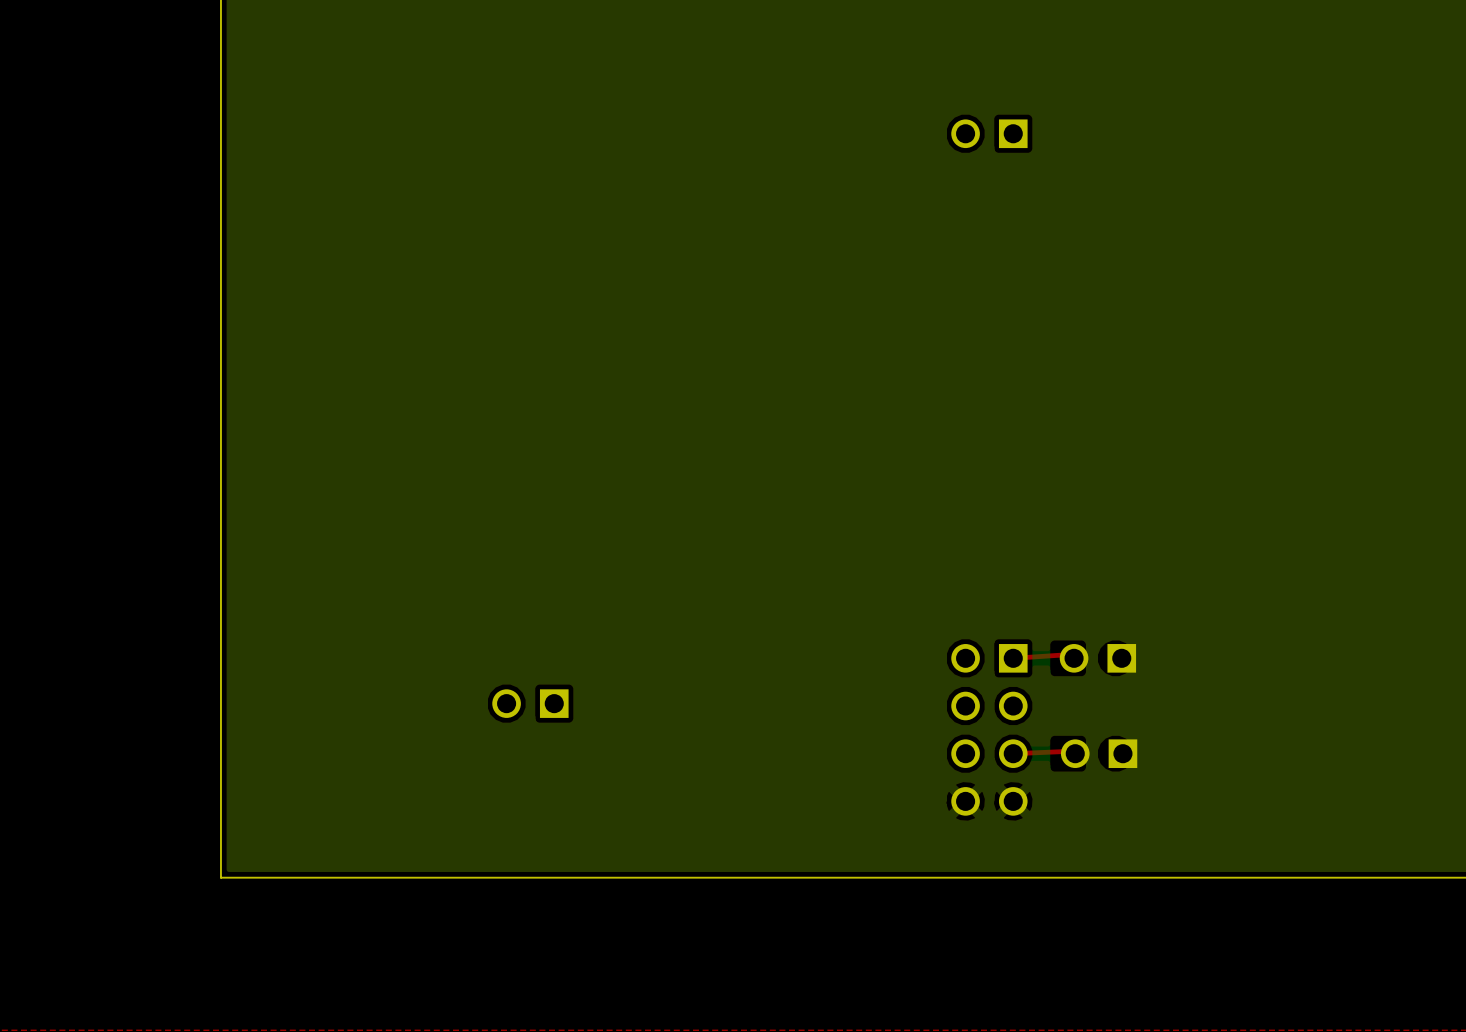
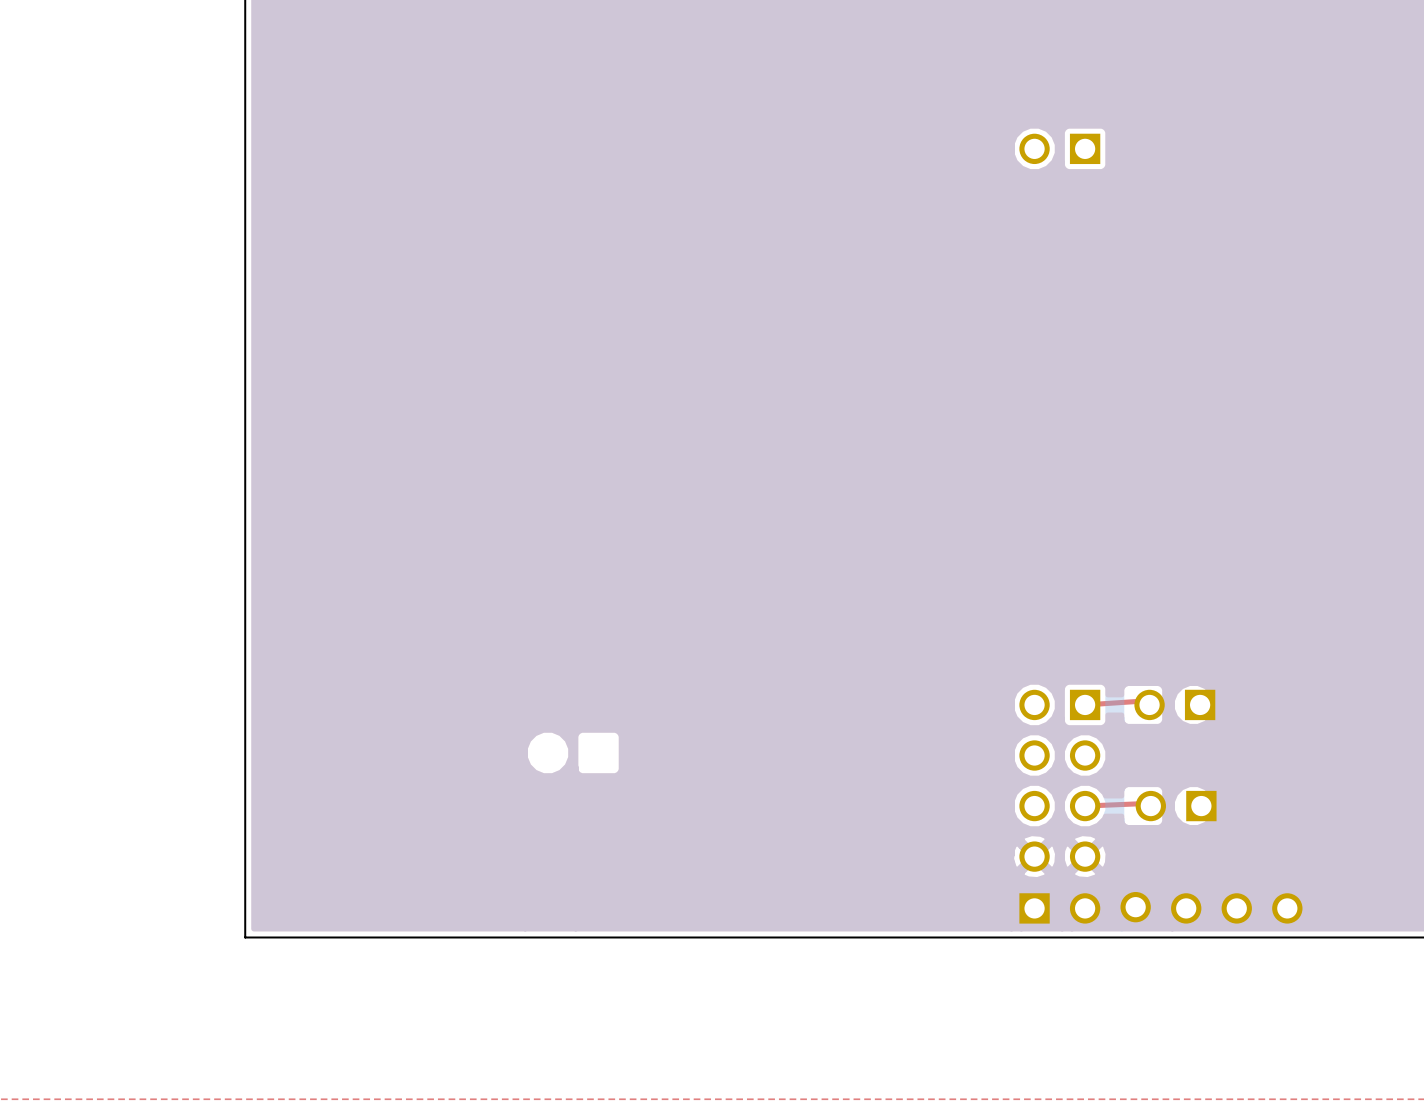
part: (530, 703) -> none
part: none -> (1160, 907)

